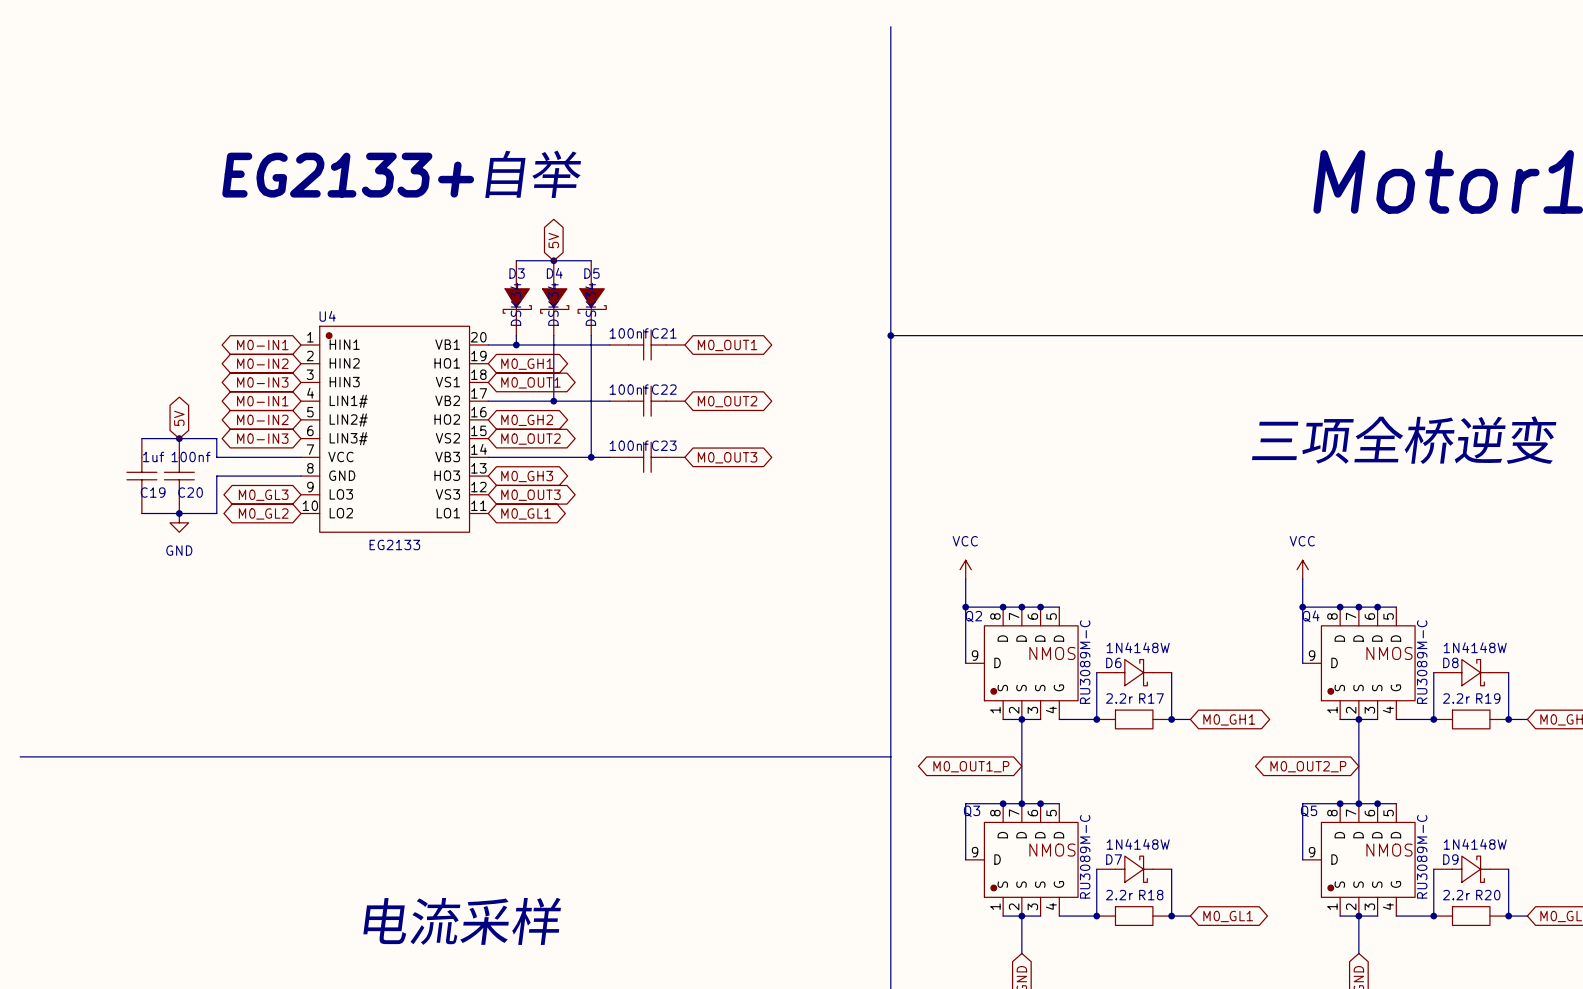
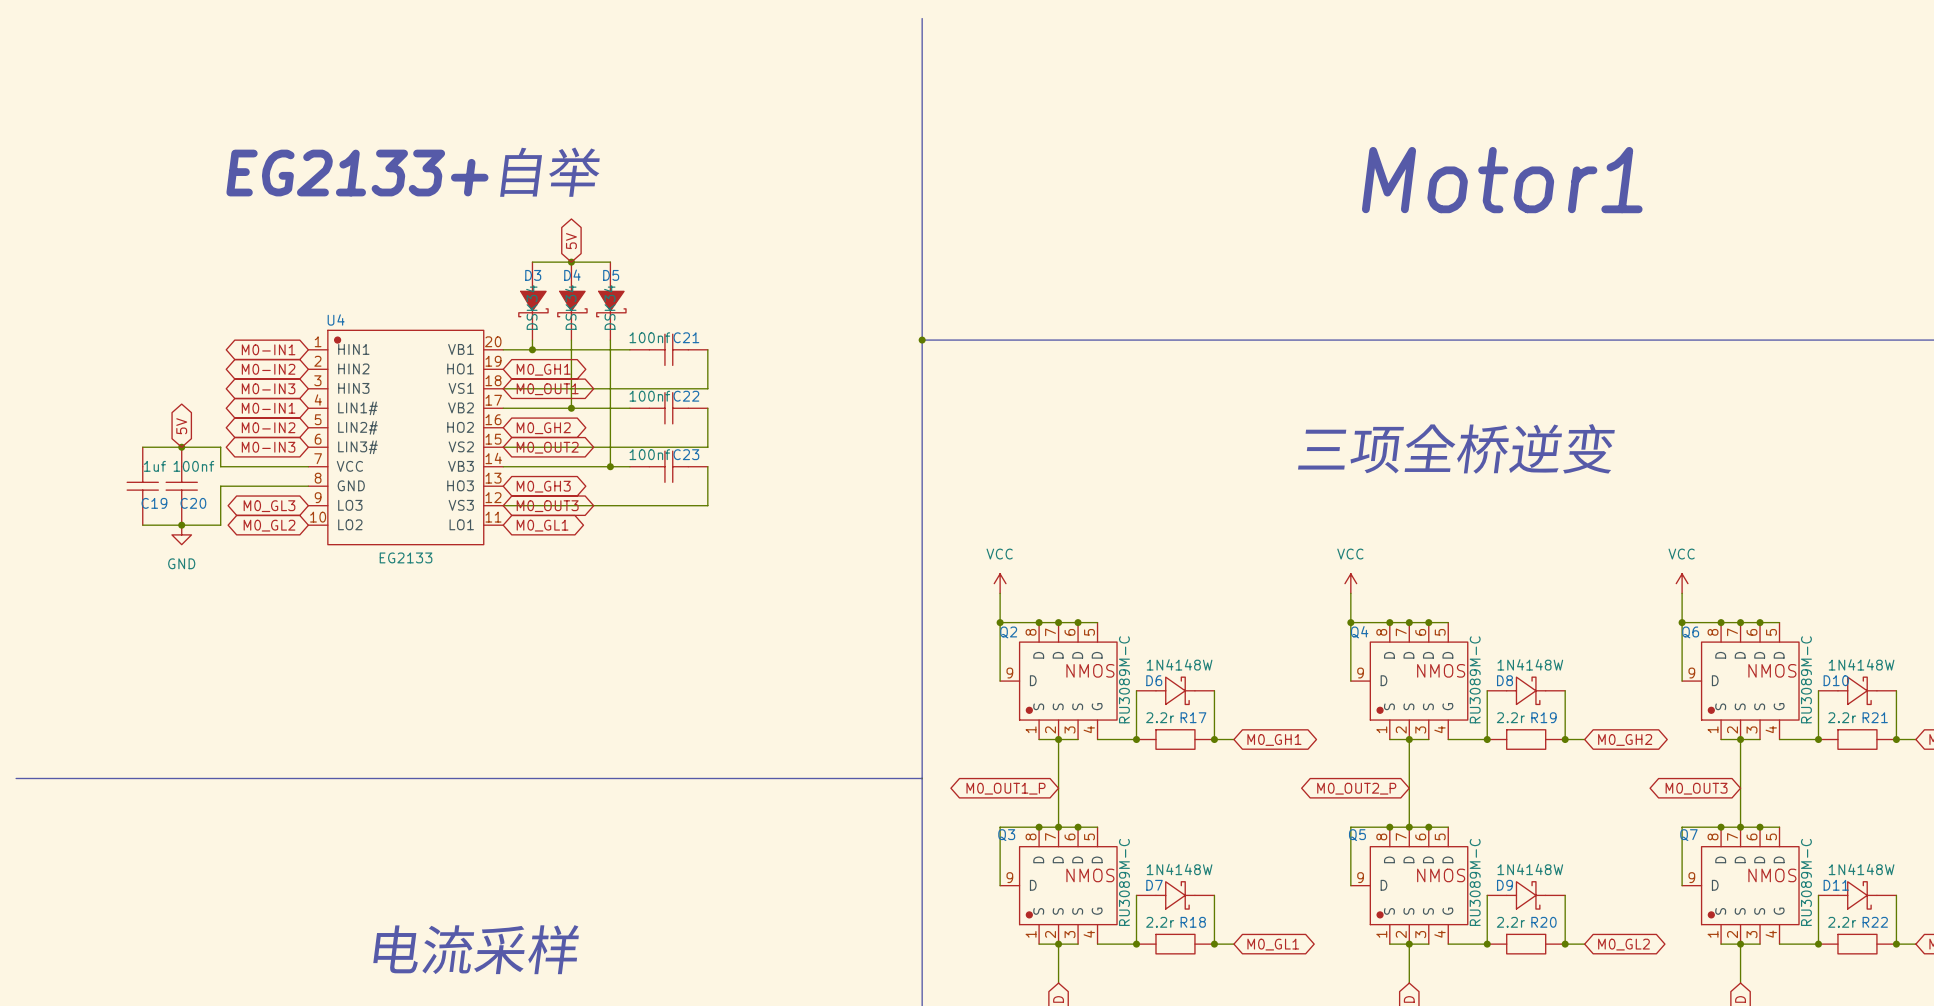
wire: none -> (707, 349) (707, 388) (503, 388)
global label: M0_OUT1 (727, 345) -> none
wire: none -> (707, 408) (707, 447) (503, 447)
global label: M0_OUT2 (727, 401) -> none
wire: none -> (707, 466) (707, 505) (503, 505)
global label: M0_OUT3 (727, 457) -> none

